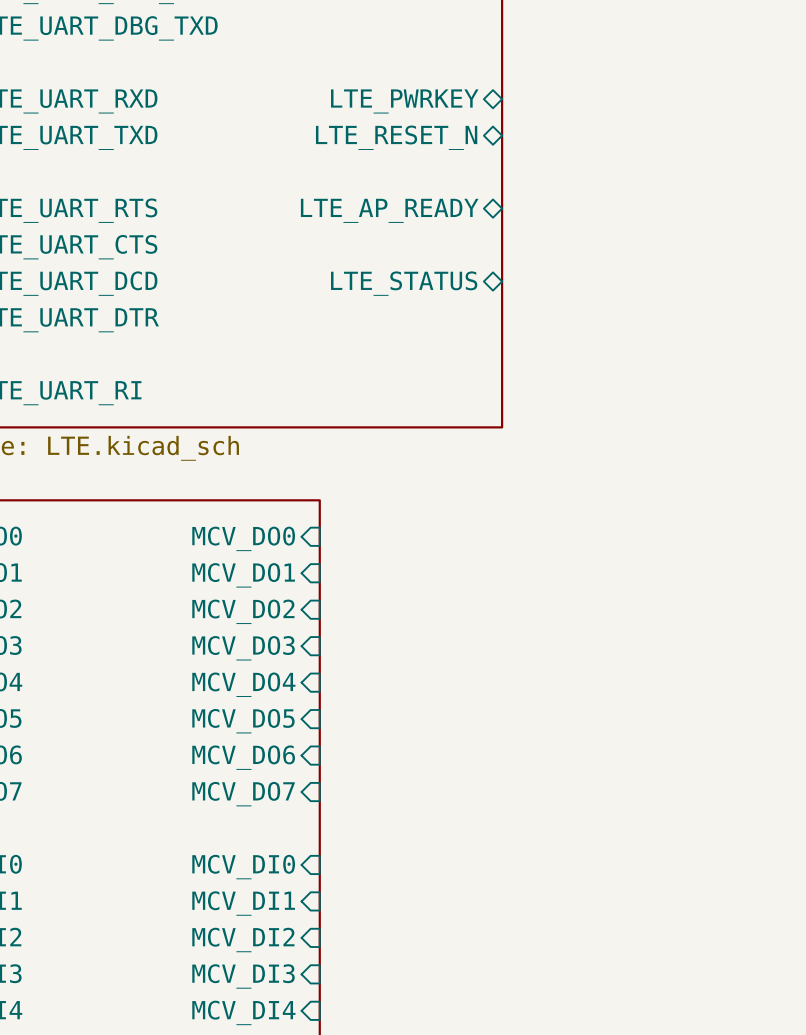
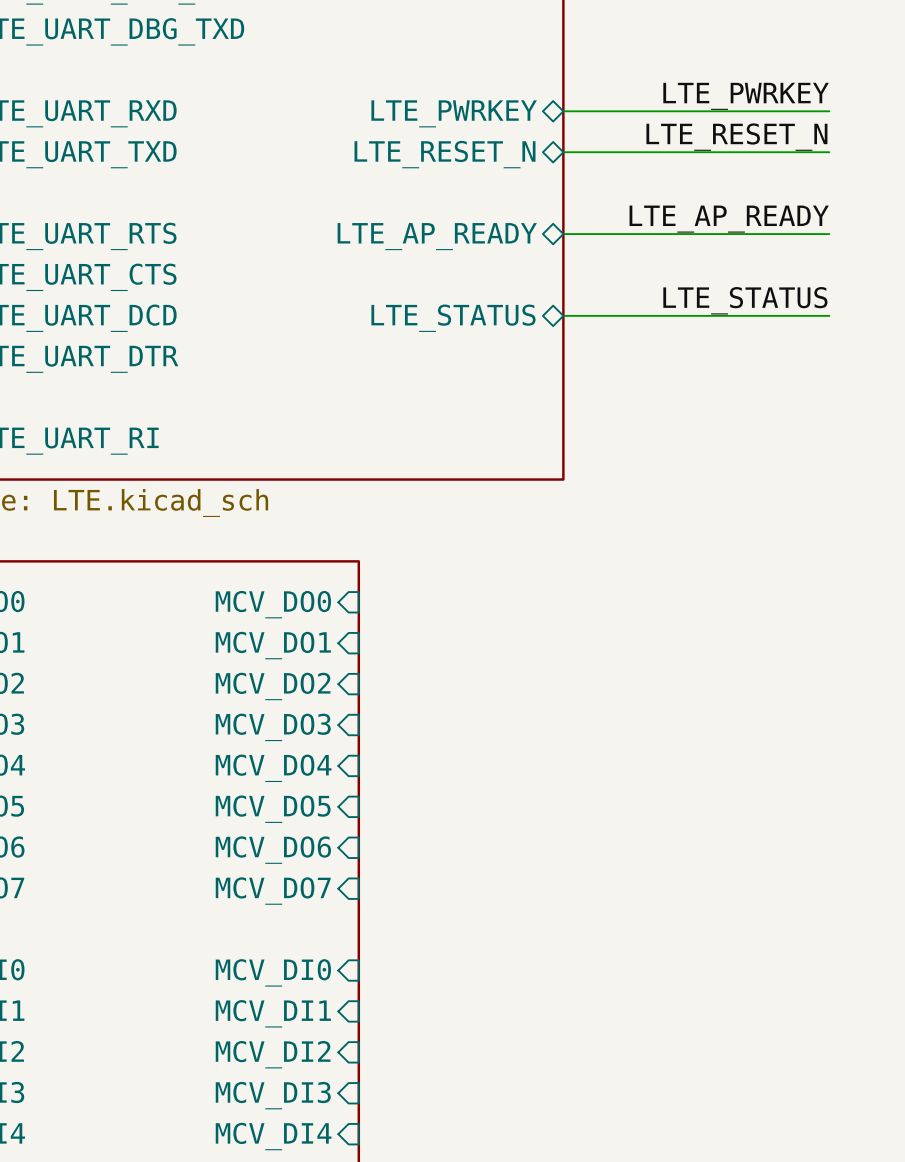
label: none -> LTE_PWRKEY (746, 96)
wire: none -> (563, 111) (829, 111)
label: none -> LTE_RESET_N (736, 137)
wire: none -> (563, 152) (829, 152)
label: none -> LTE_AP_READY (729, 219)
wire: none -> (563, 234) (829, 234)
label: none -> LTE_STATUS (745, 300)
wire: none -> (563, 315) (829, 315)

